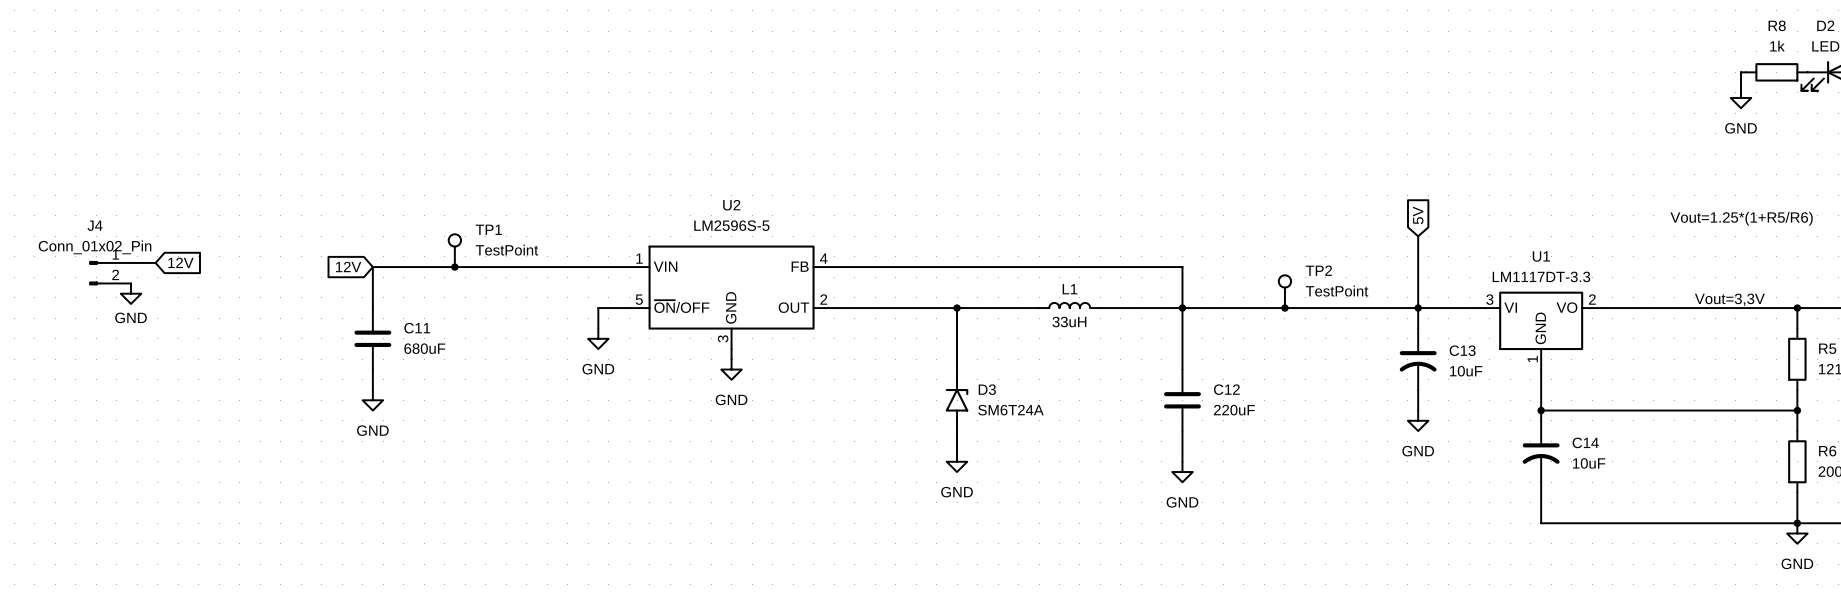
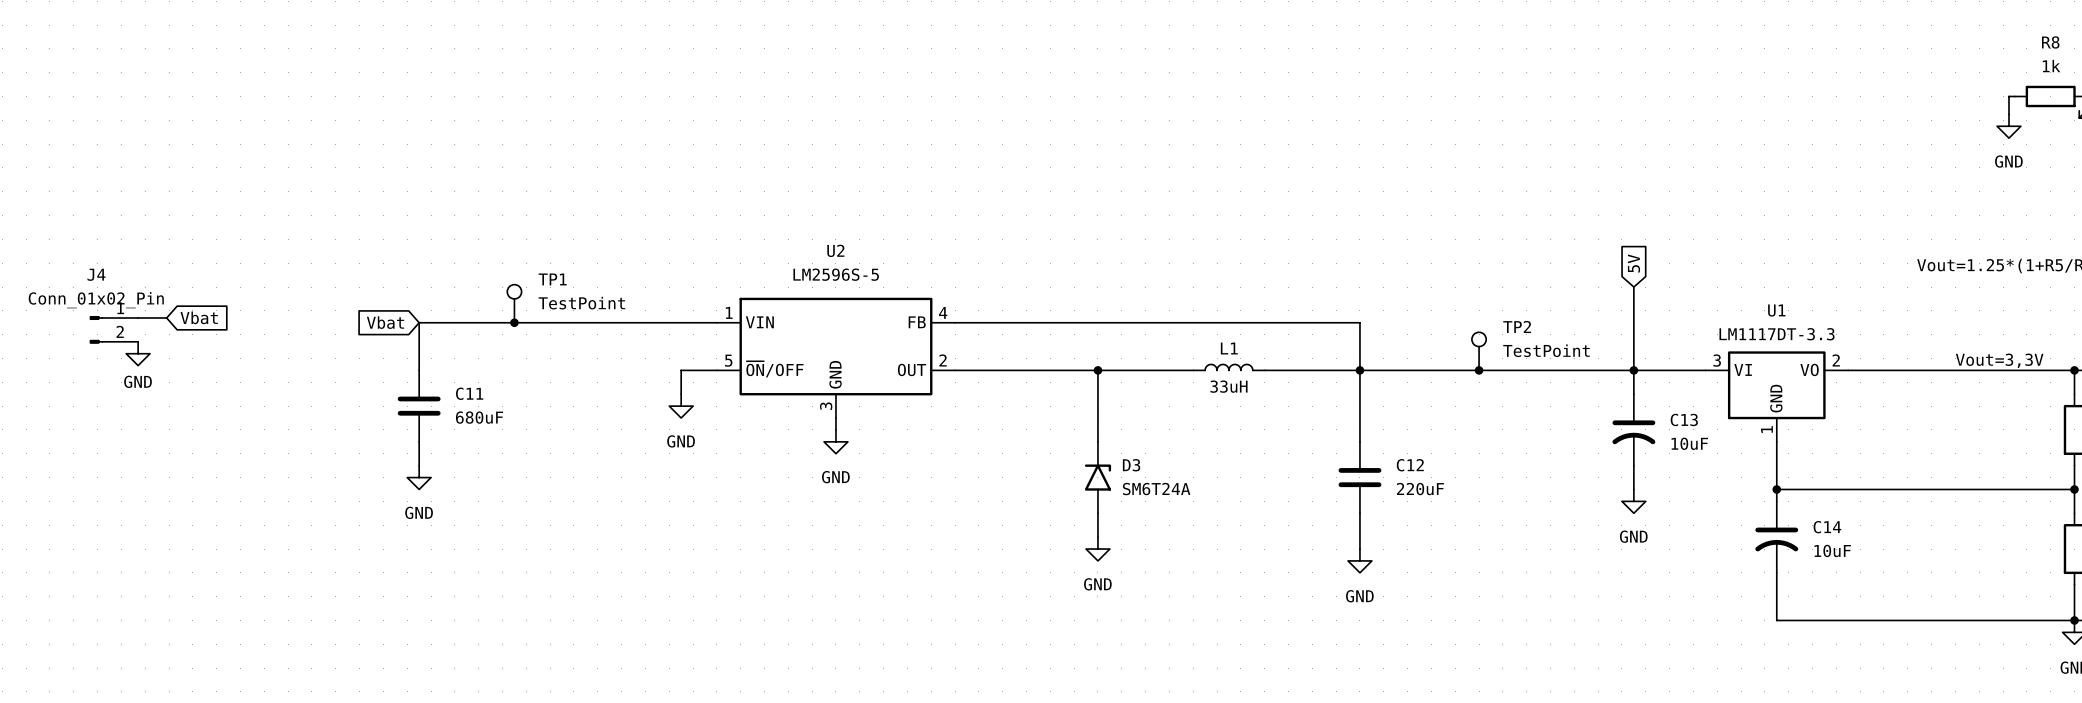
global label: 12V (180, 262) -> Vbat (199, 317)
global label: 12V (348, 266) -> Vbat (385, 322)

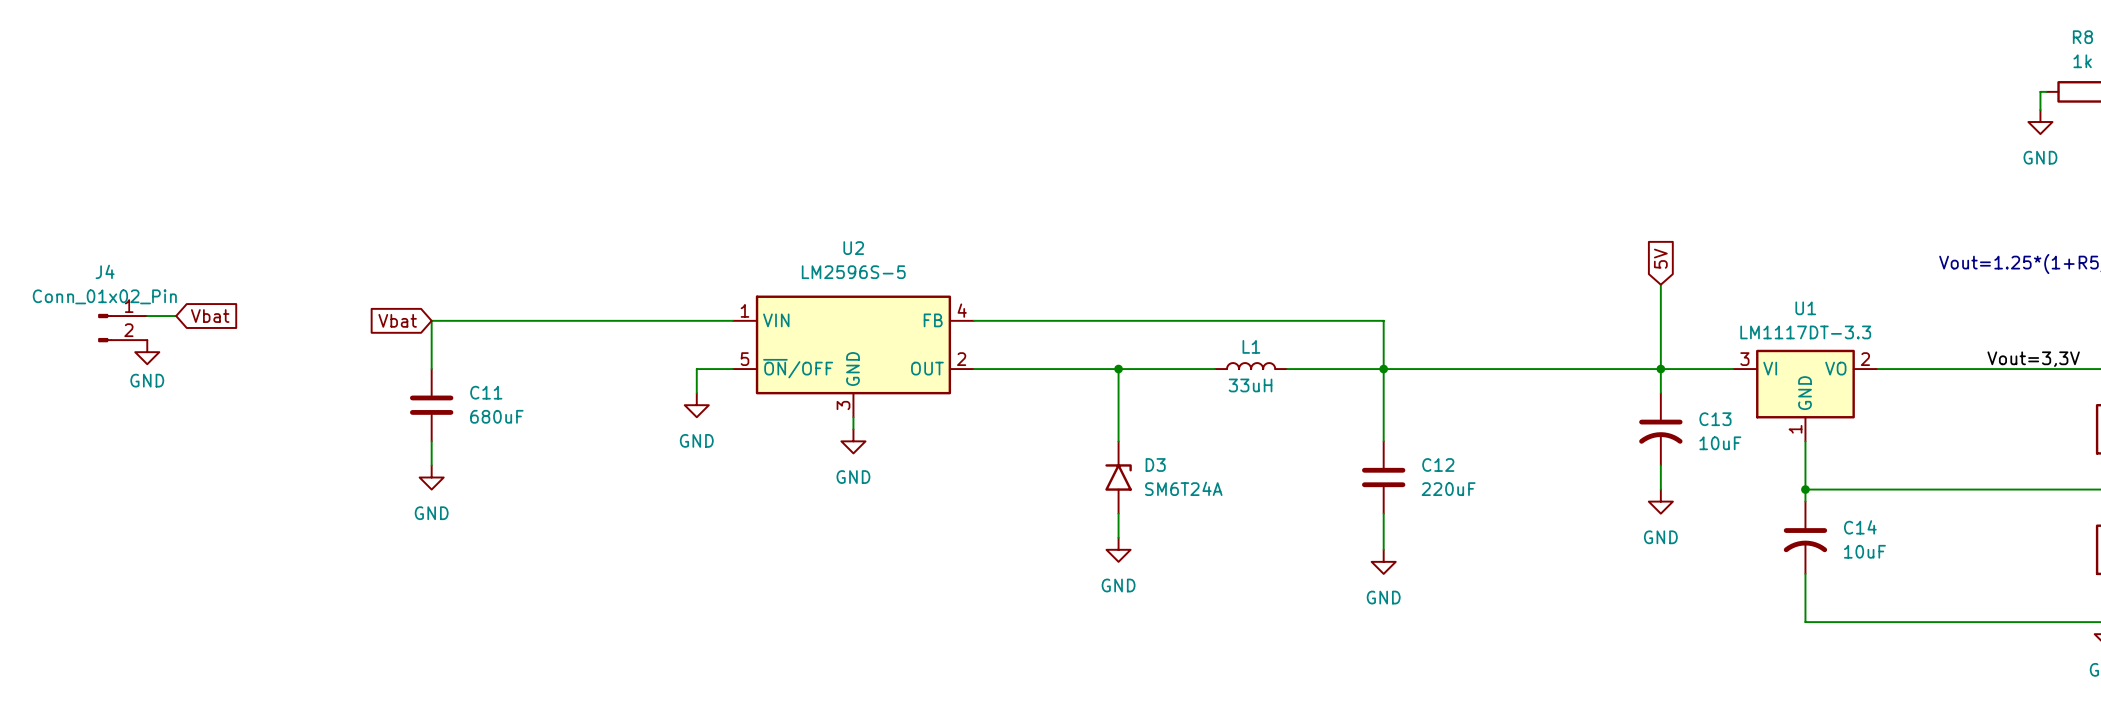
TP1: TestPoint (514, 303) -> none
junction: (514, 322) -> none
TP2: TestPoint (1479, 351) -> none
junction: (1479, 370) -> none

